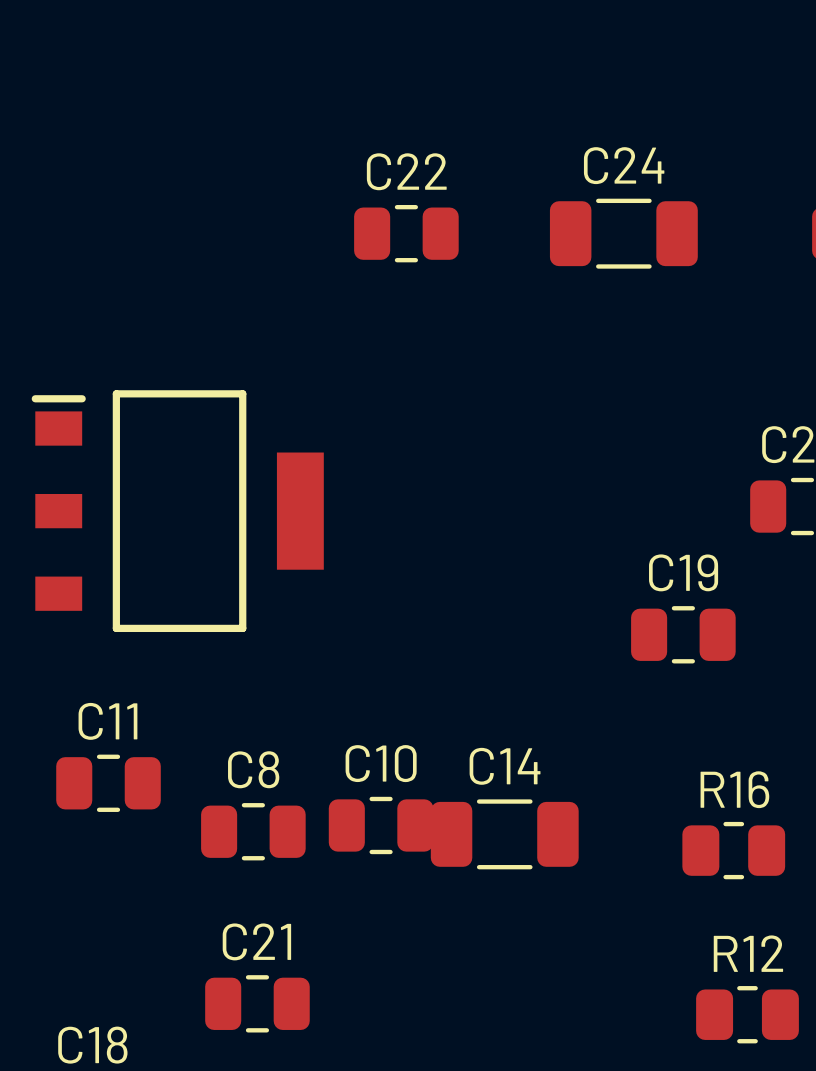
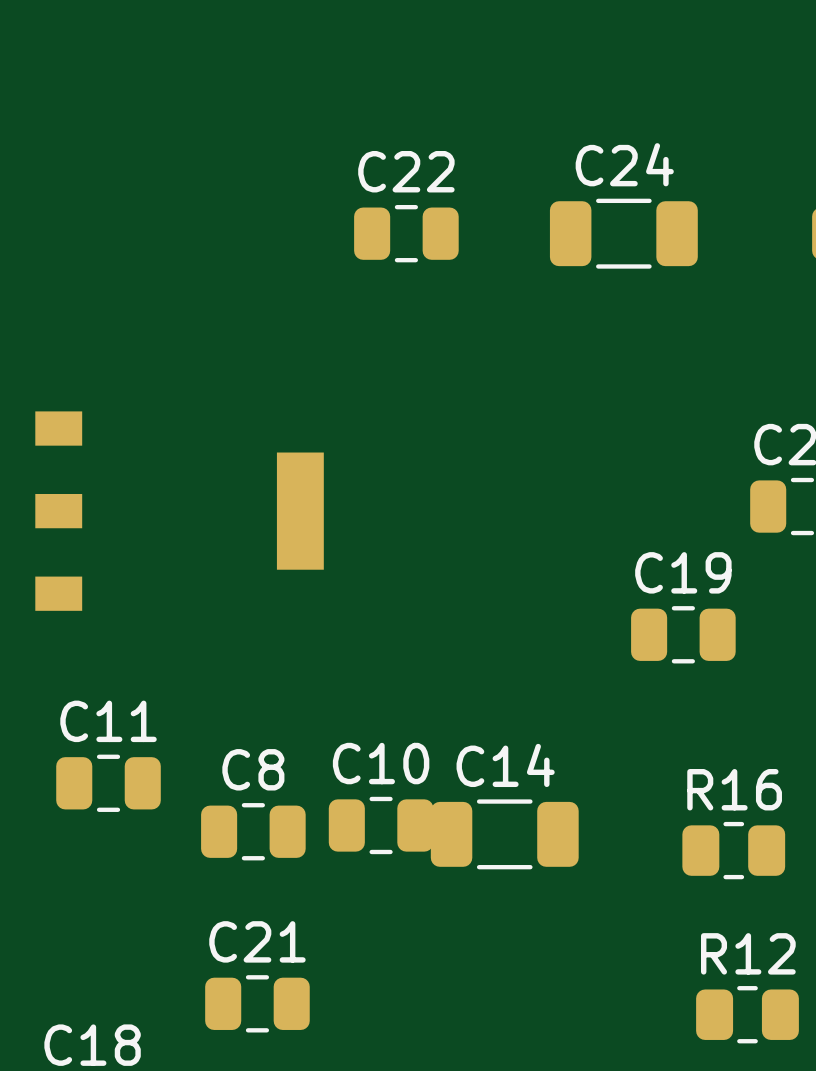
line: (116, 393) (116, 628) (242, 628) (242, 393) (116, 393) -> none
line: (35, 398) (82, 398) -> none

